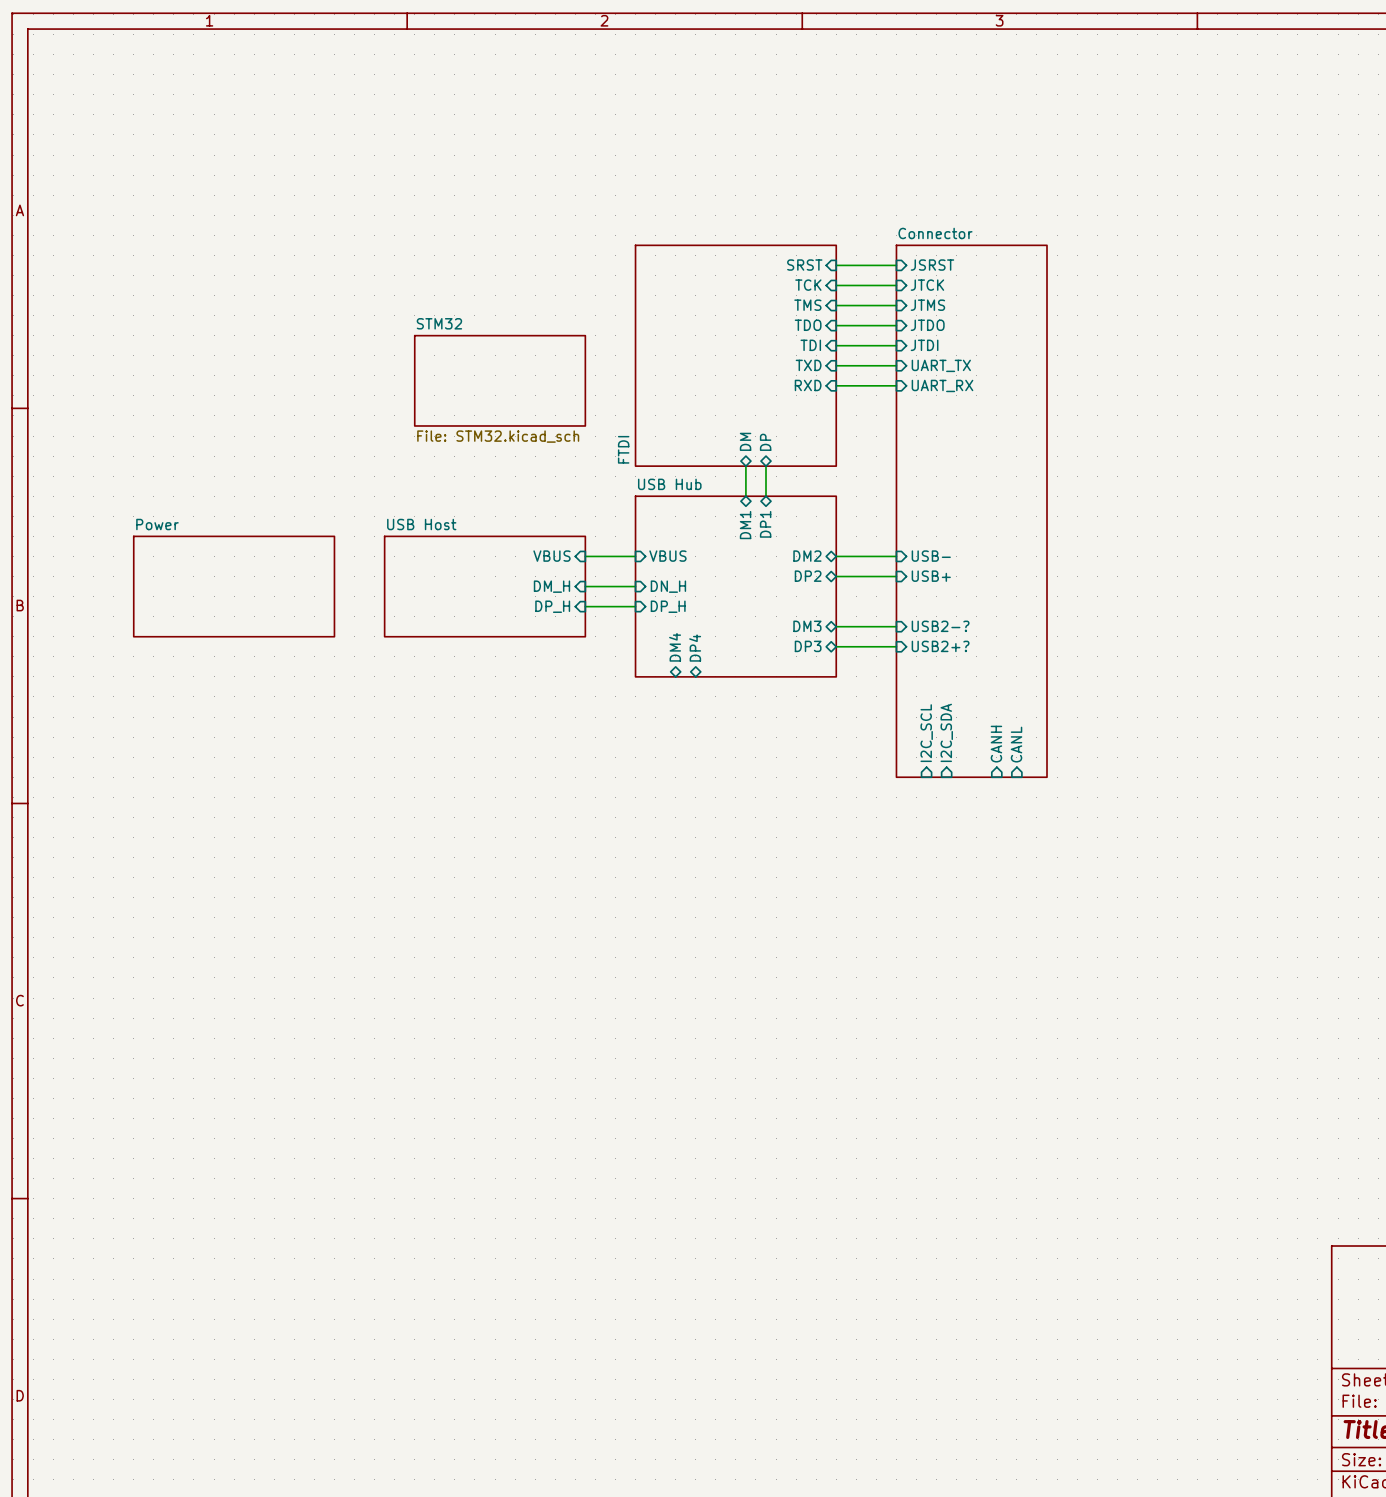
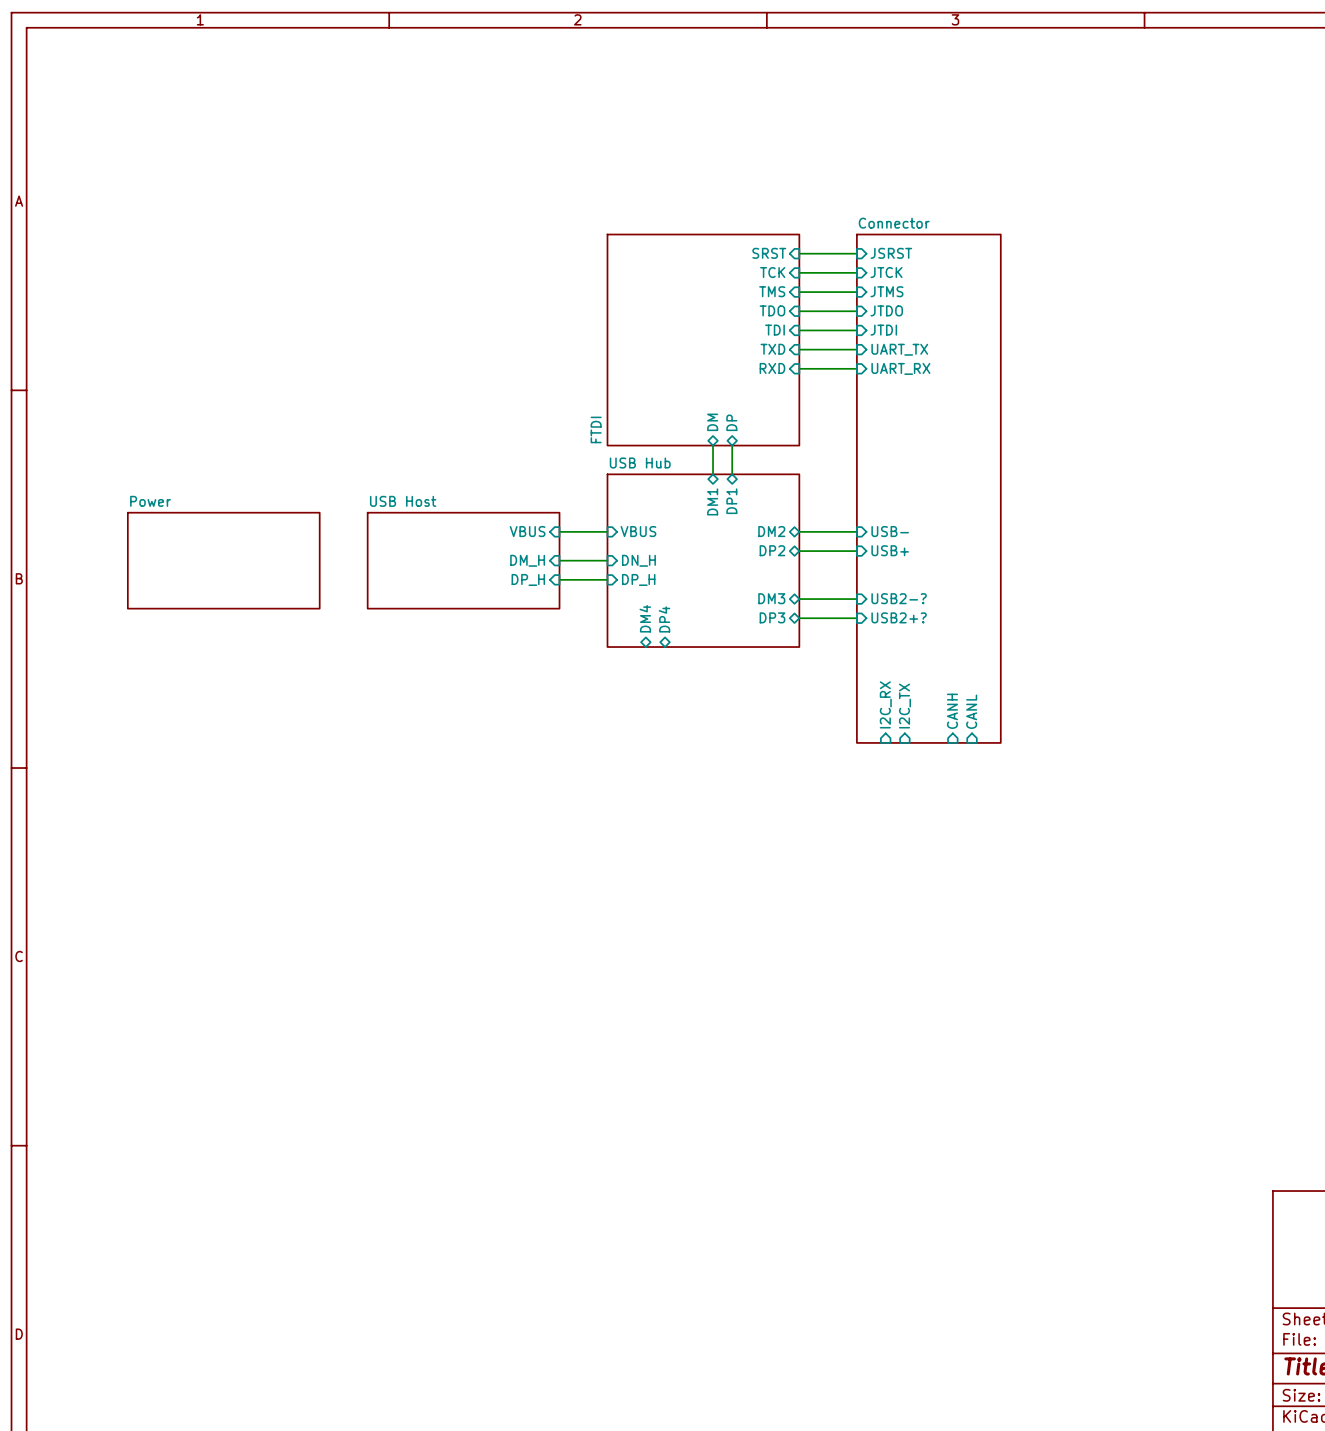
sheet STM32: File: STM32.kicad_sch (500, 380) -> none
sheet pin: I2C_SDA (946, 732) -> I2C_TX (904, 706)
sheet pin: I2C_SCL (926, 733) -> I2C_RX (885, 704)

